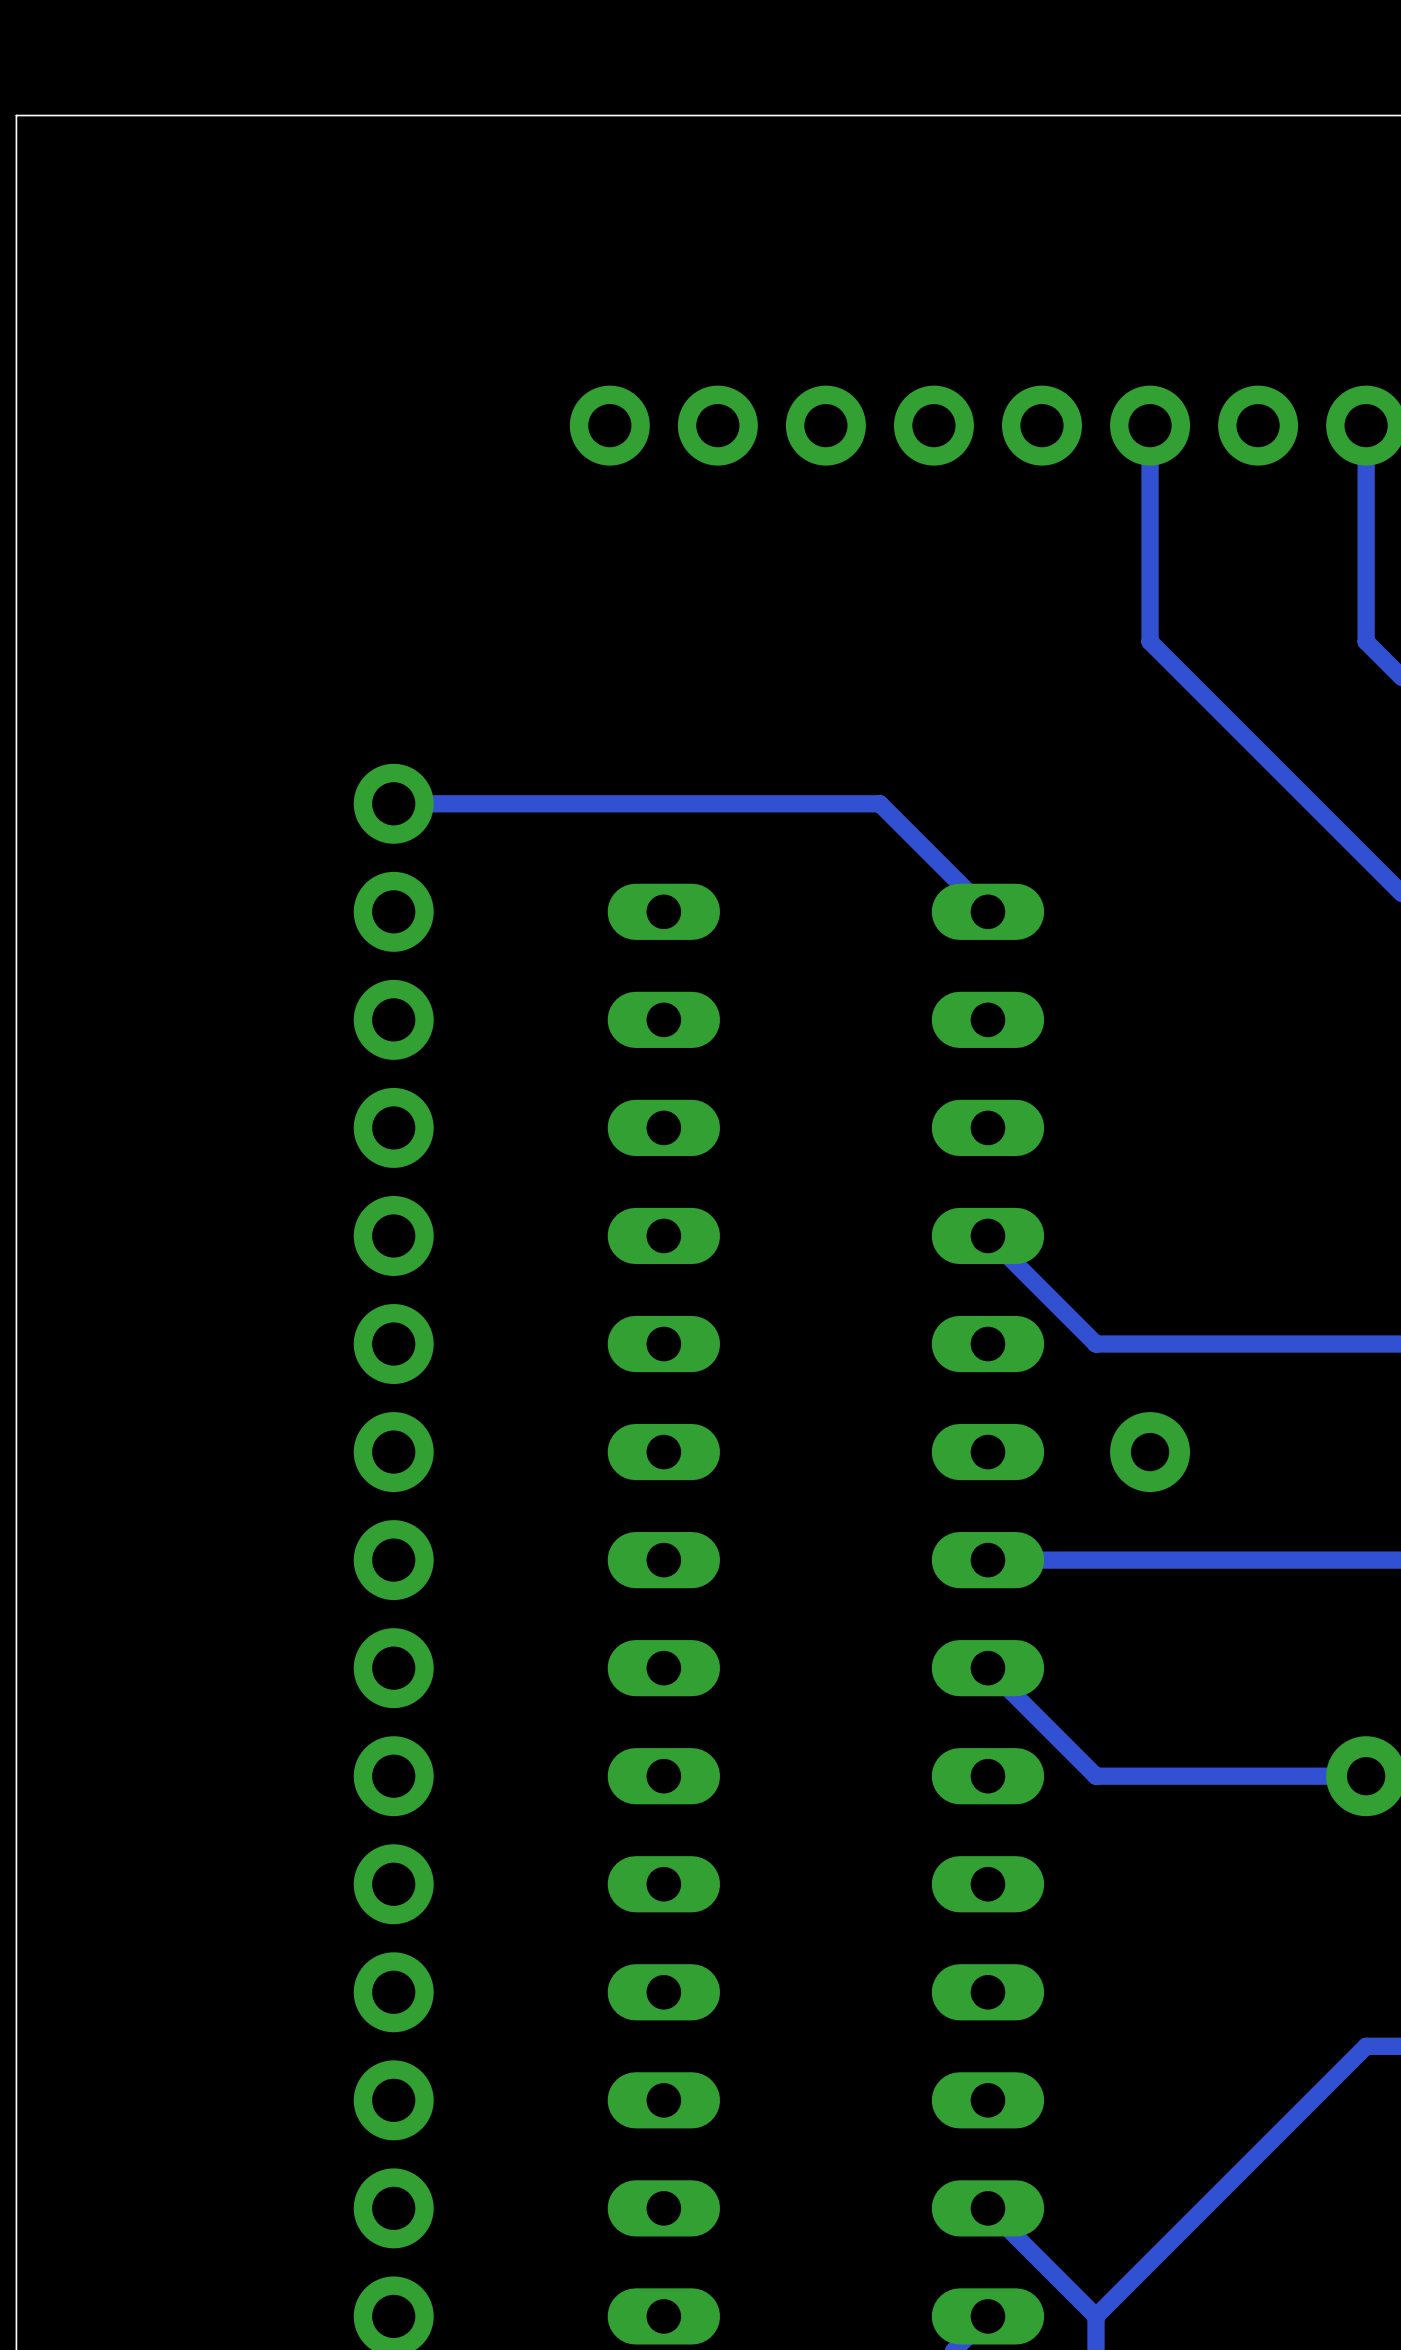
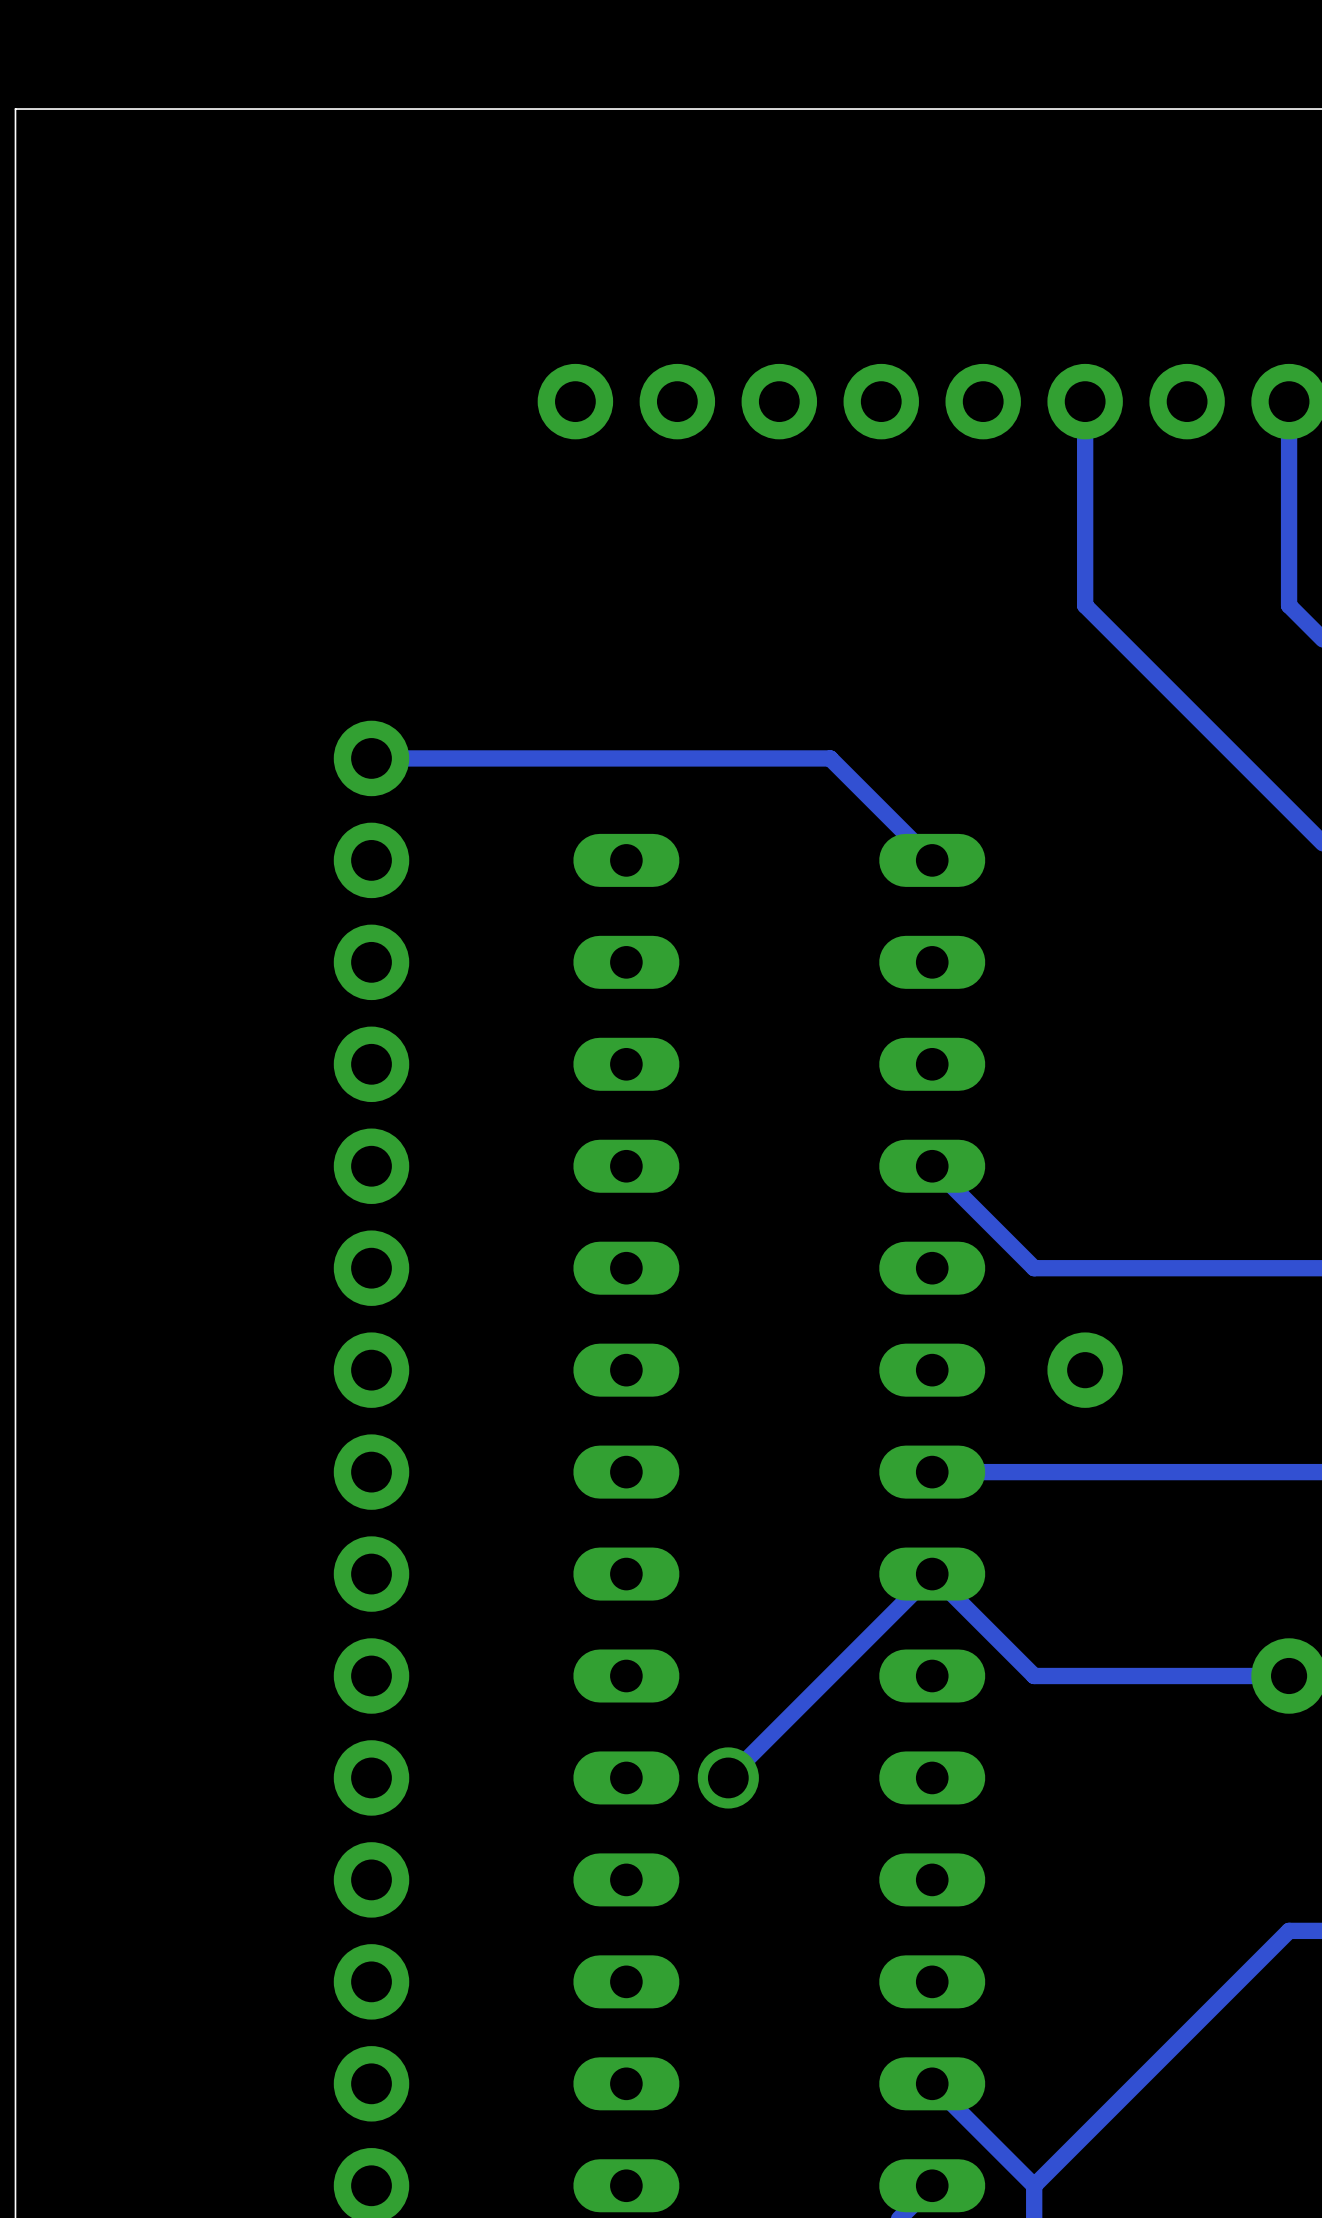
track: none -> (932, 1574) (728, 1777)
via: none -> (728, 1777)

